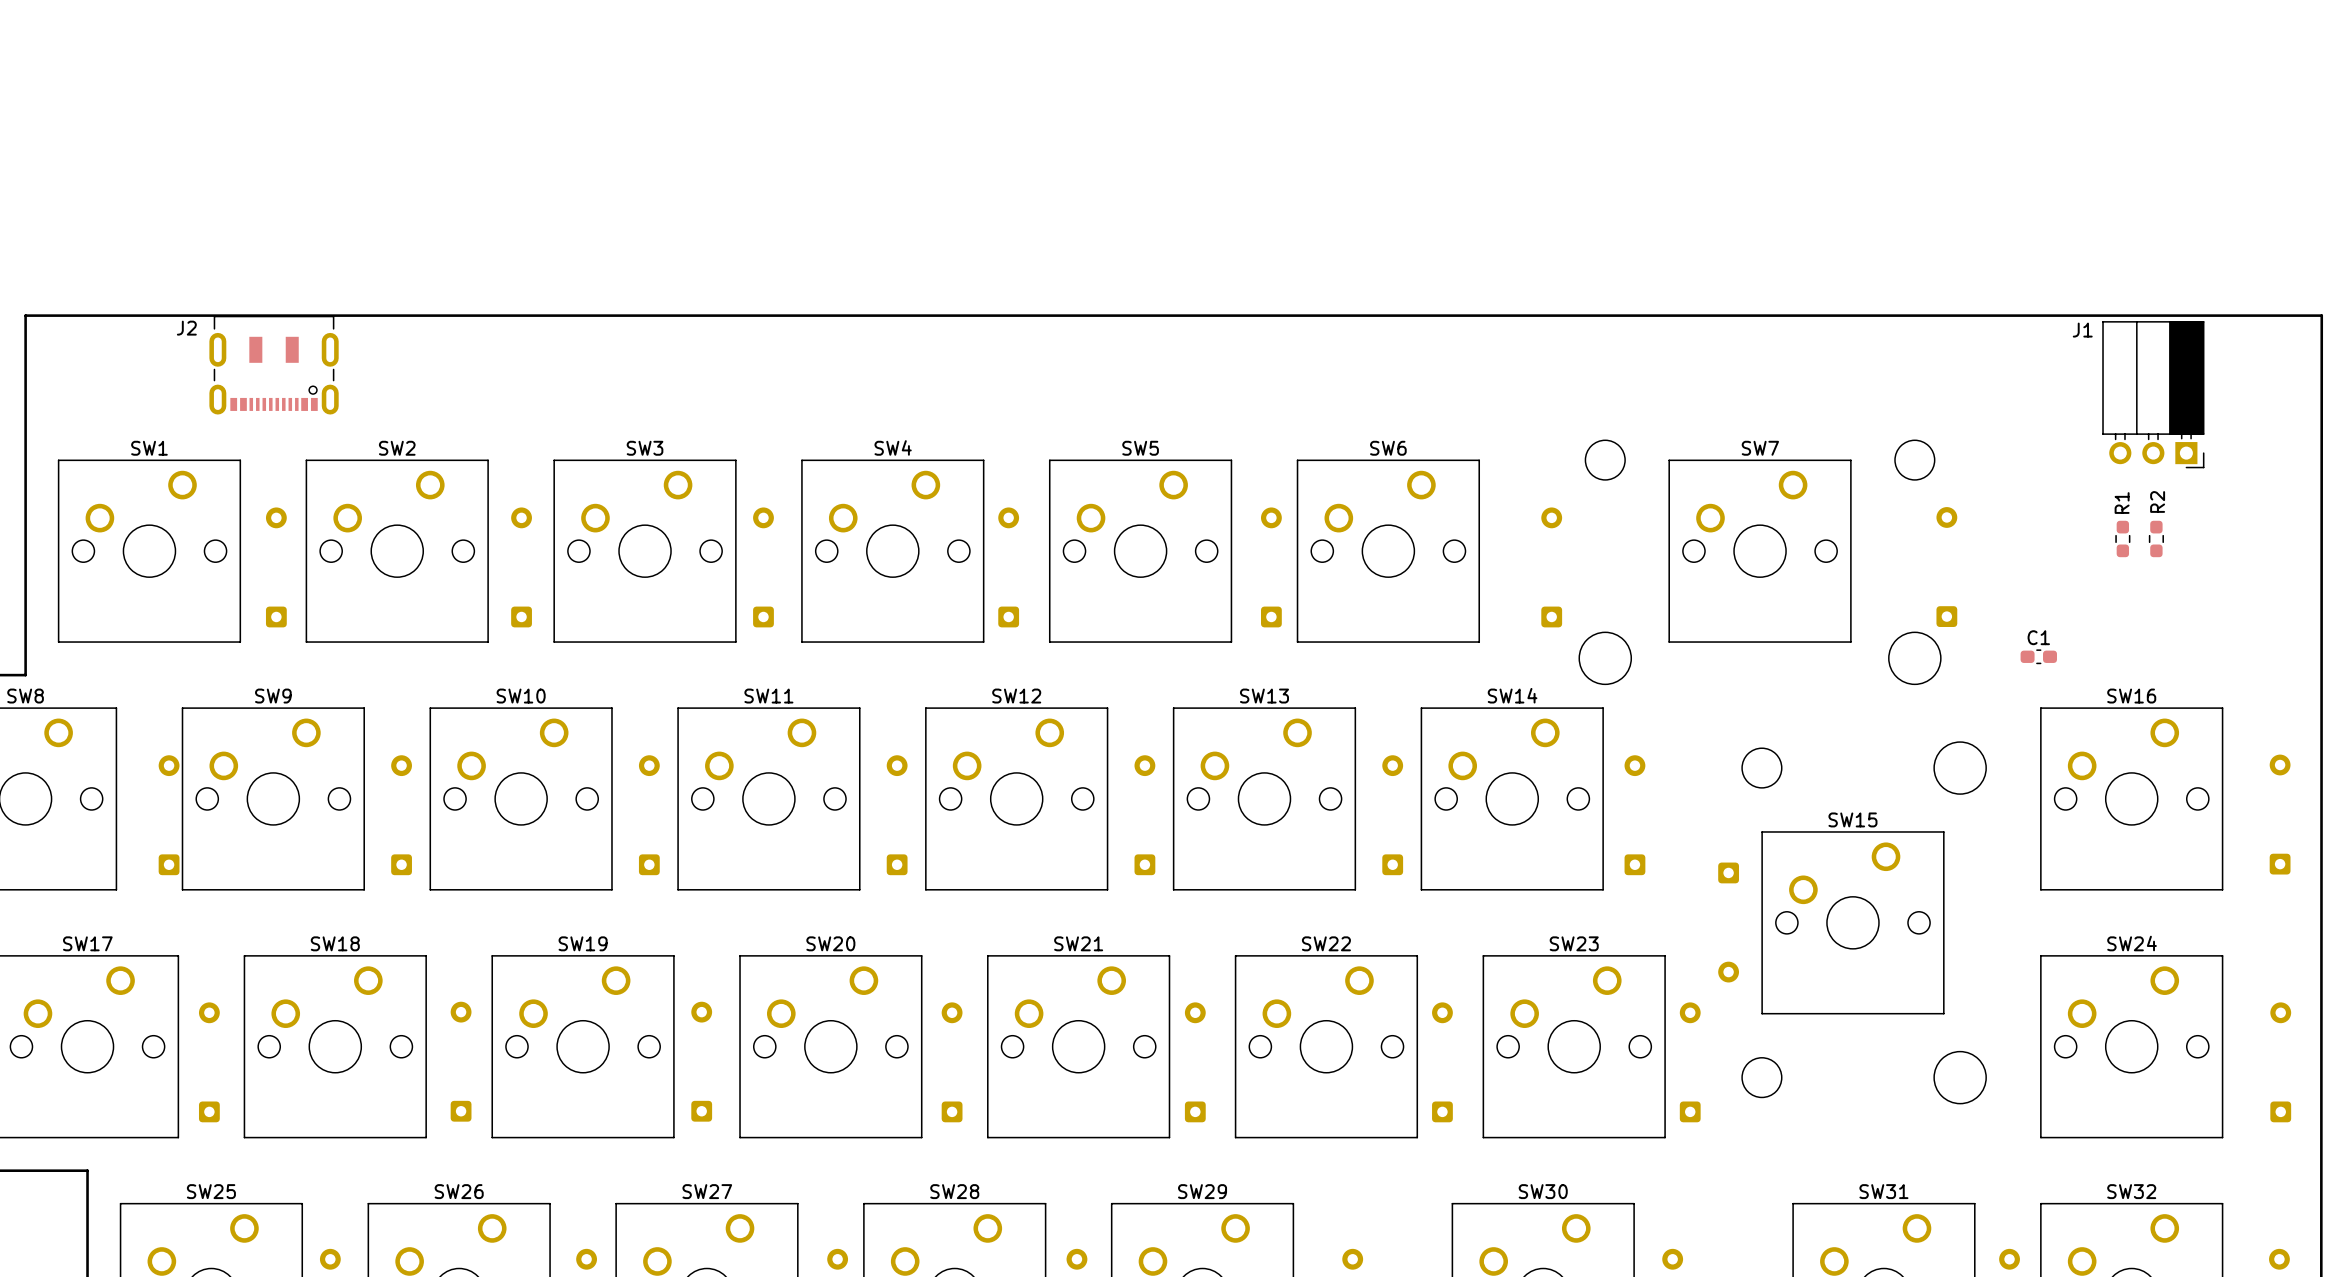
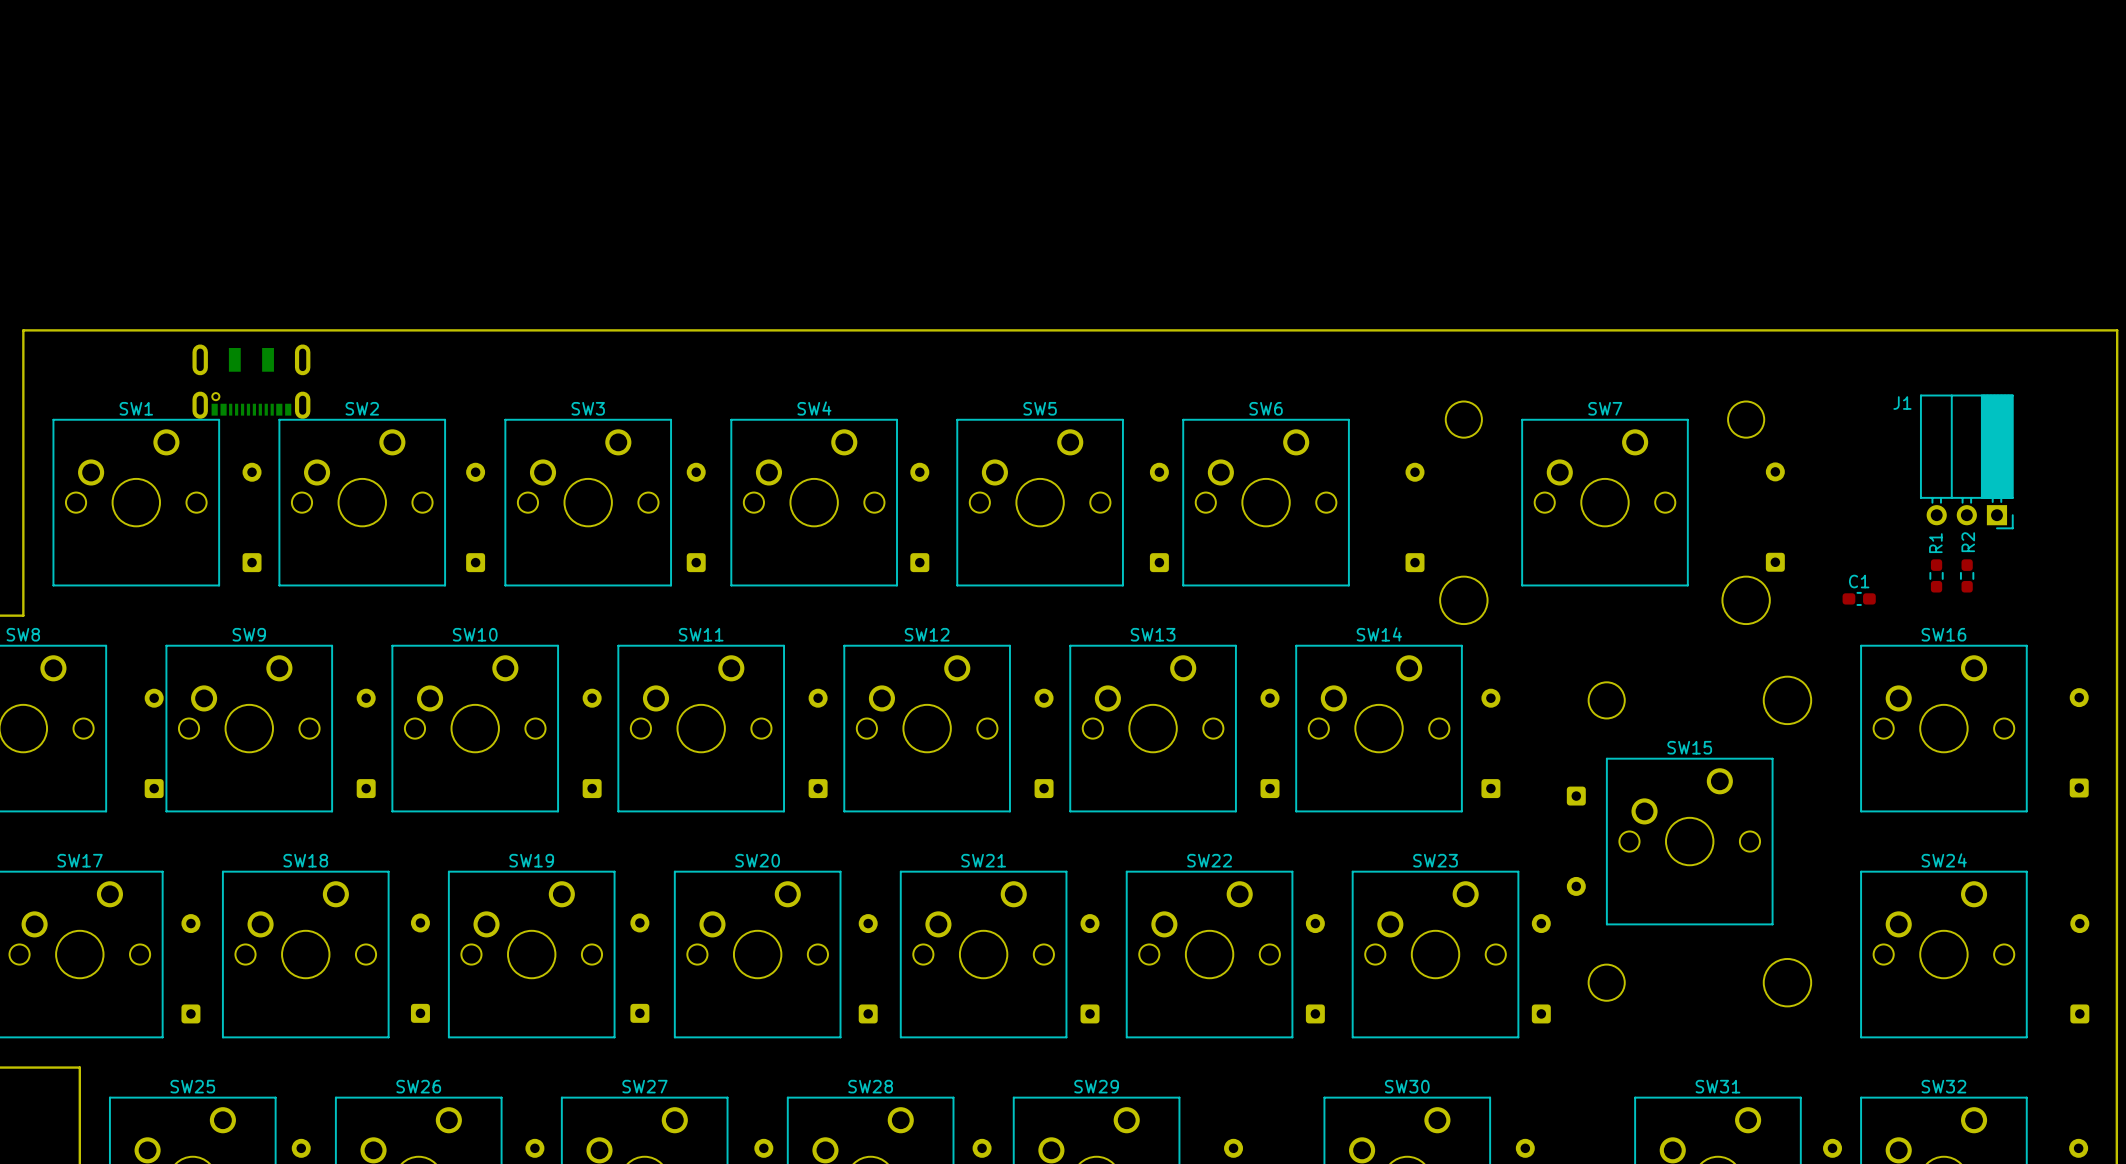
board edge: (25, 362) (25, 315) (2321, 315) (2321, 362) -> (23, 330) (2117, 330)
J2 side: top (274, 365) -> bottom (251, 381)
J1 position: (2153, 394) -> (1966, 461)
R1 position: (2122, 538) -> (1936, 575)
R2 position: (2156, 538) -> (1967, 575)

